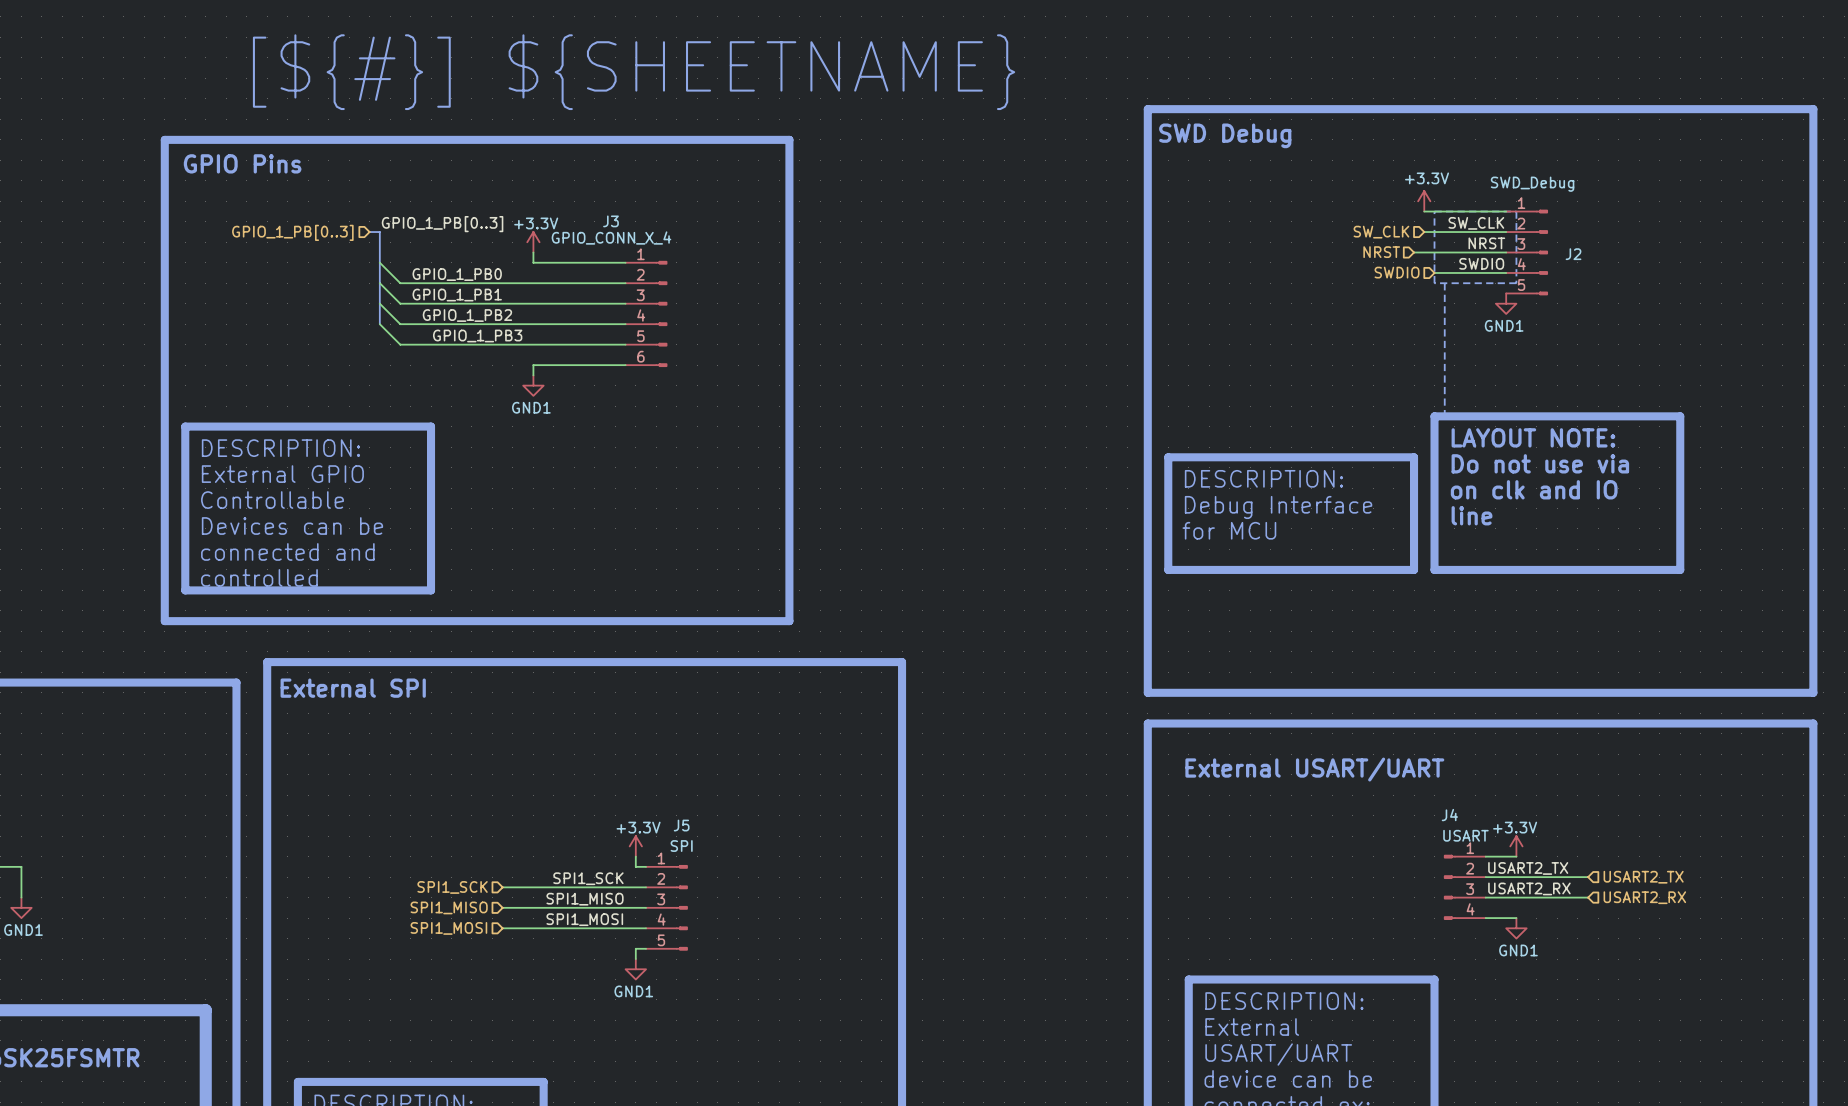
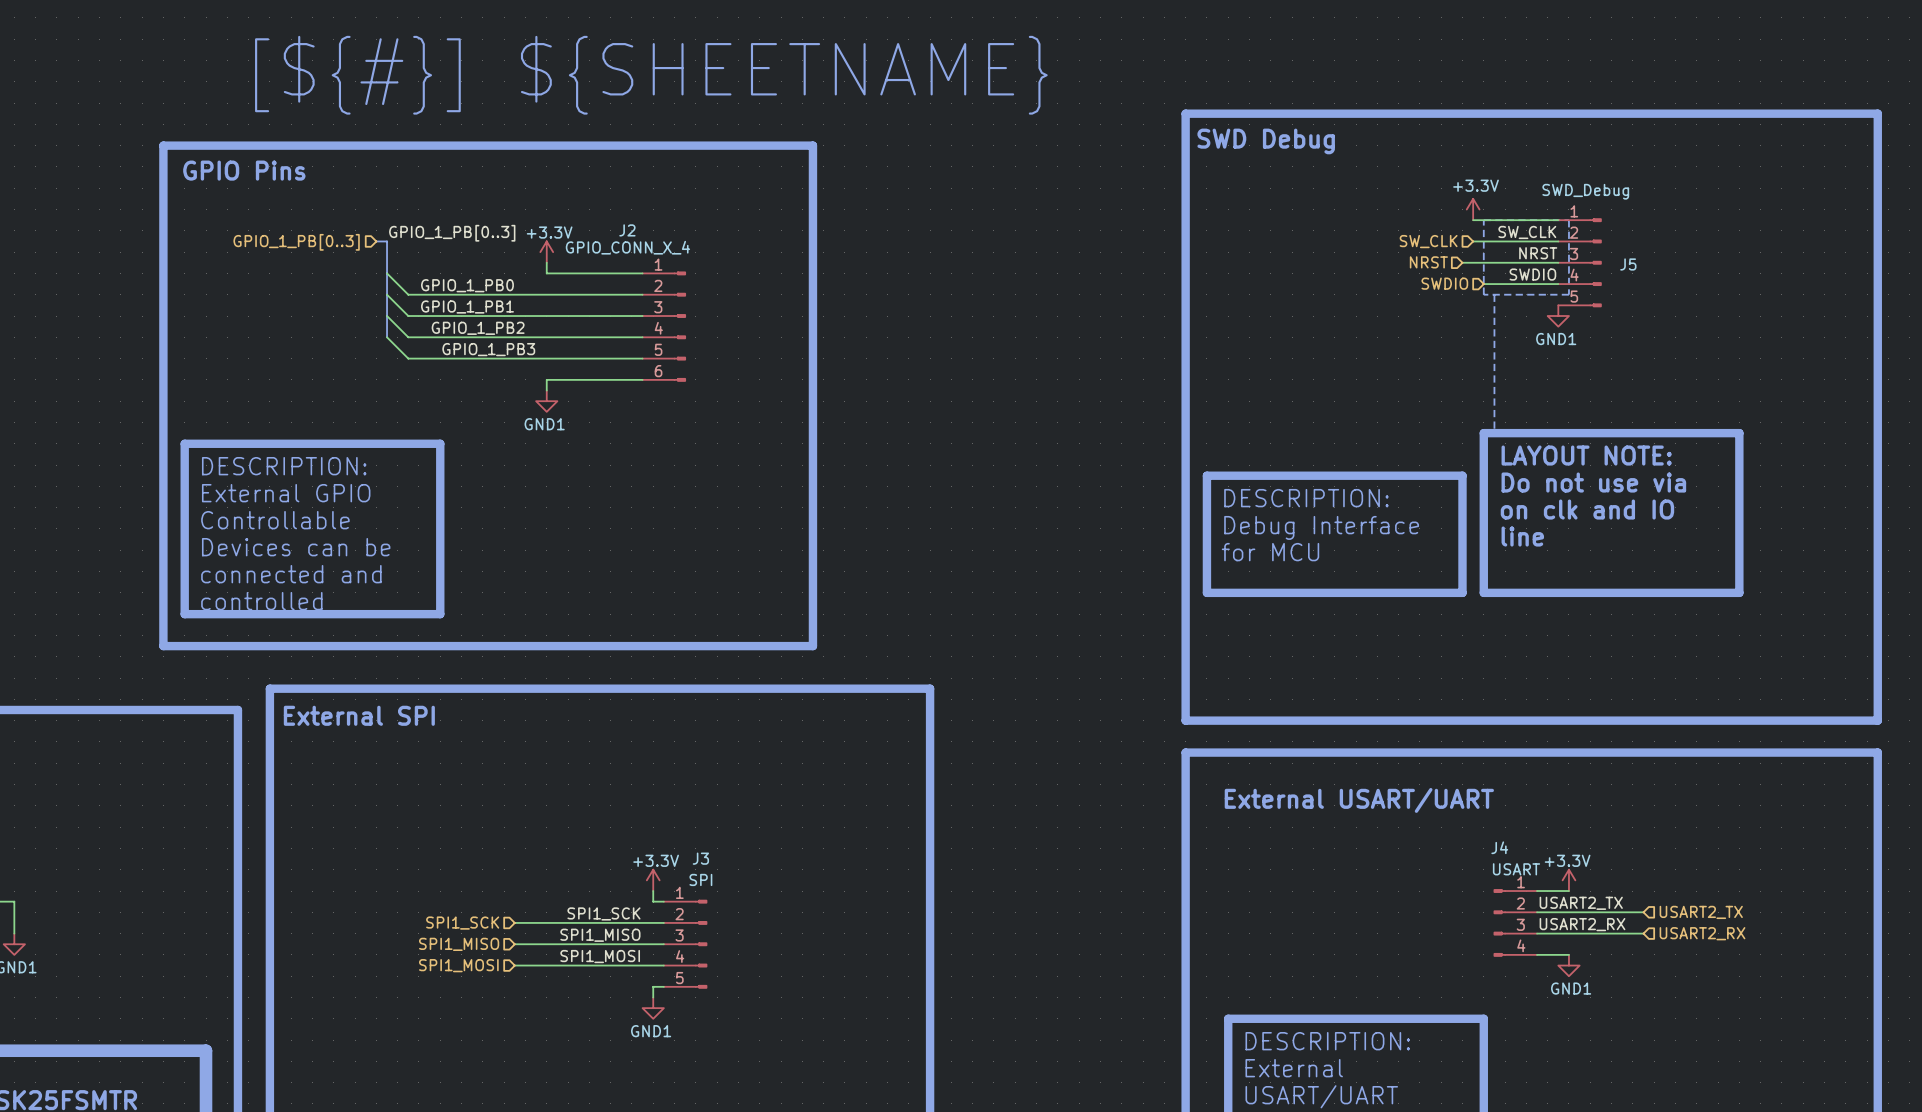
J3 name: J3 (611, 221) -> J2 (627, 230)
J2 name: J2 (1573, 254) -> J5 (1628, 264)
J5 name: J5 (681, 825) -> J3 (700, 858)

